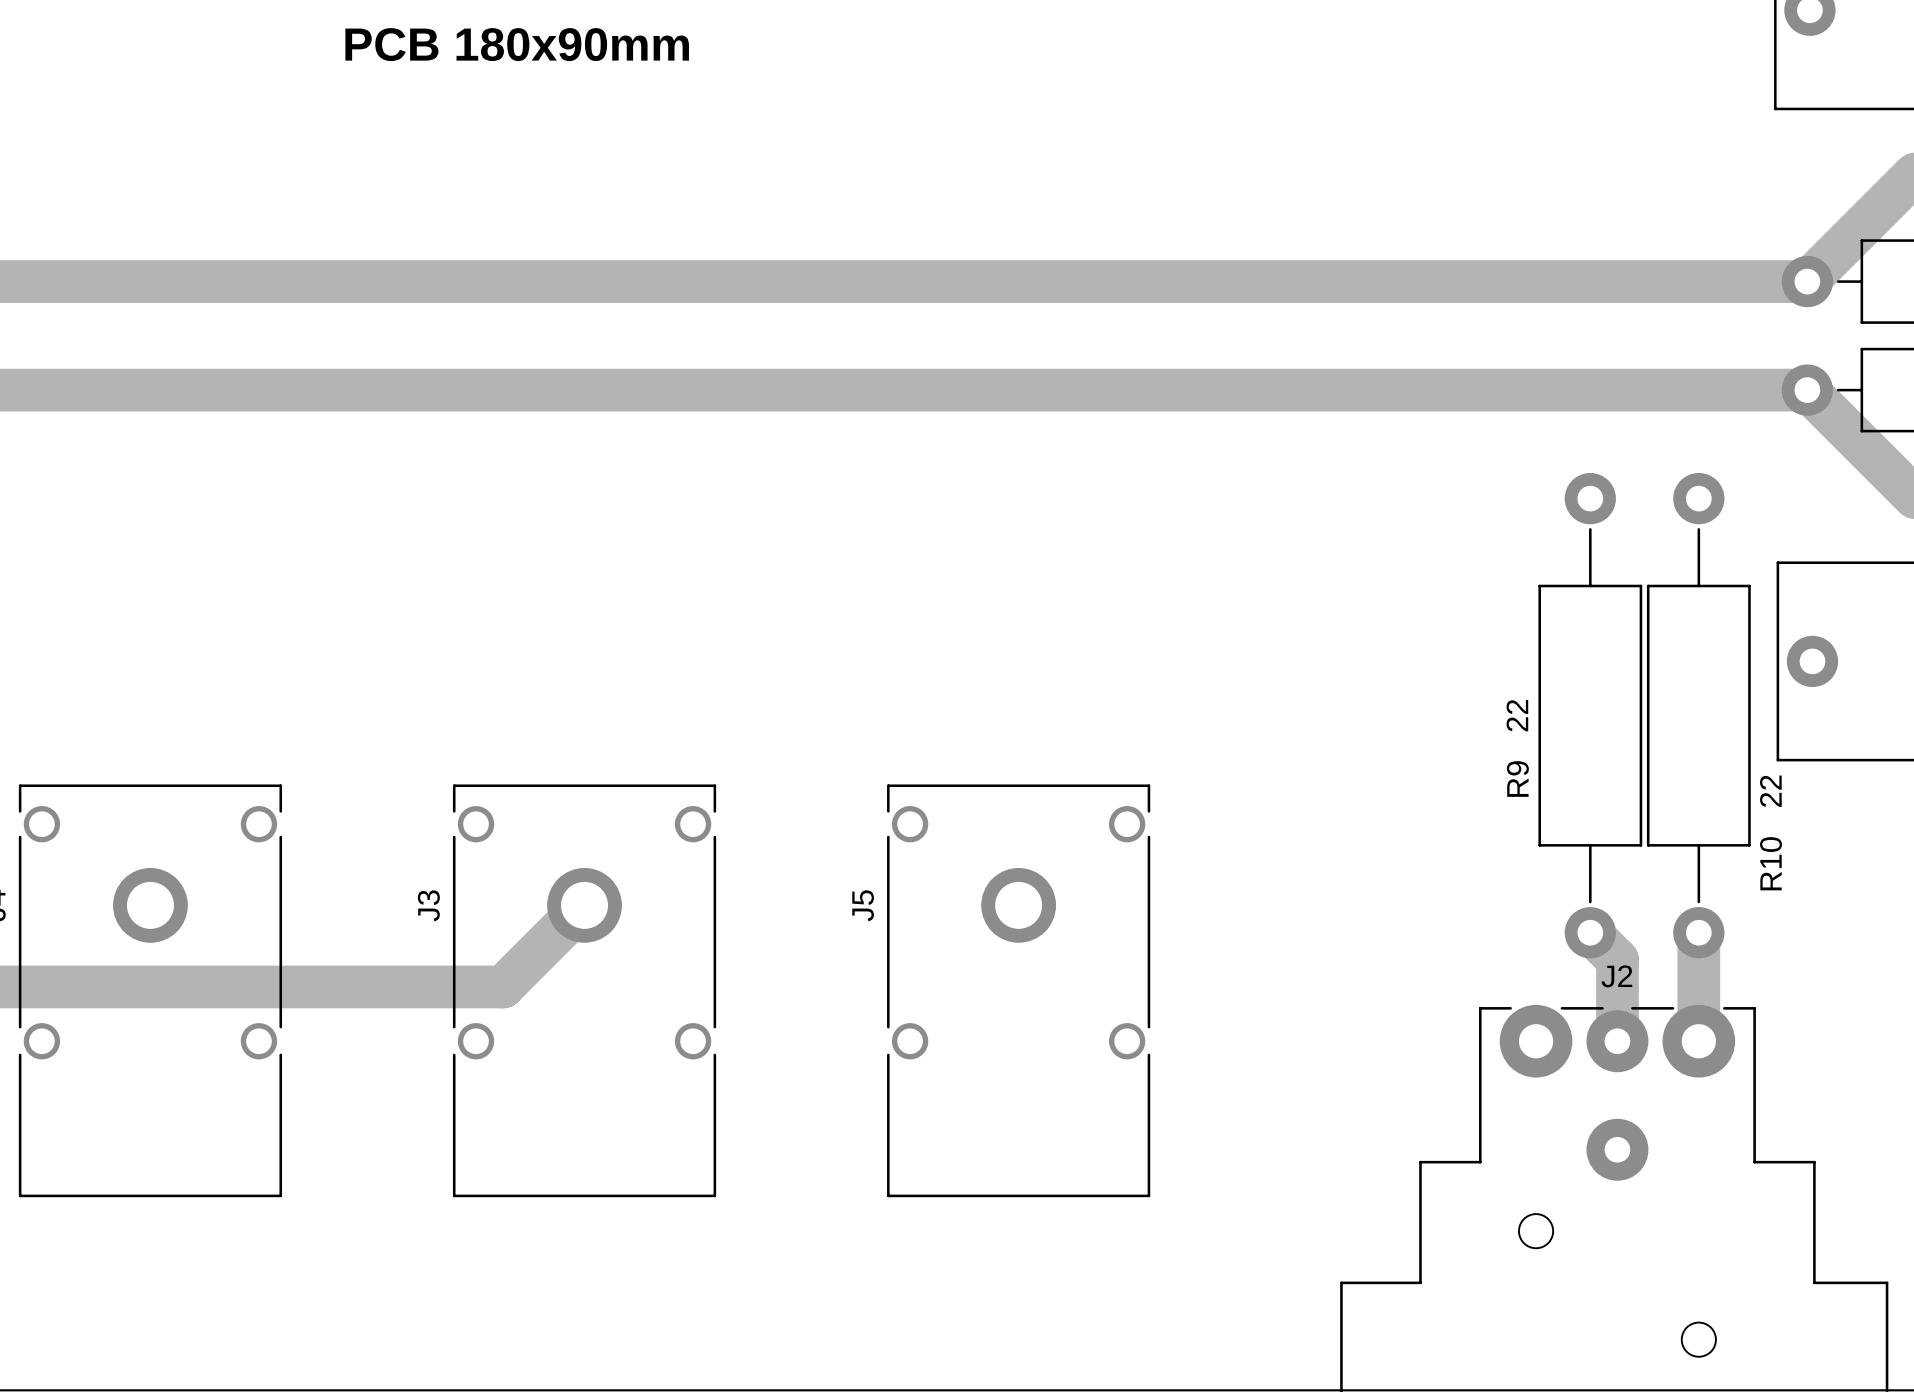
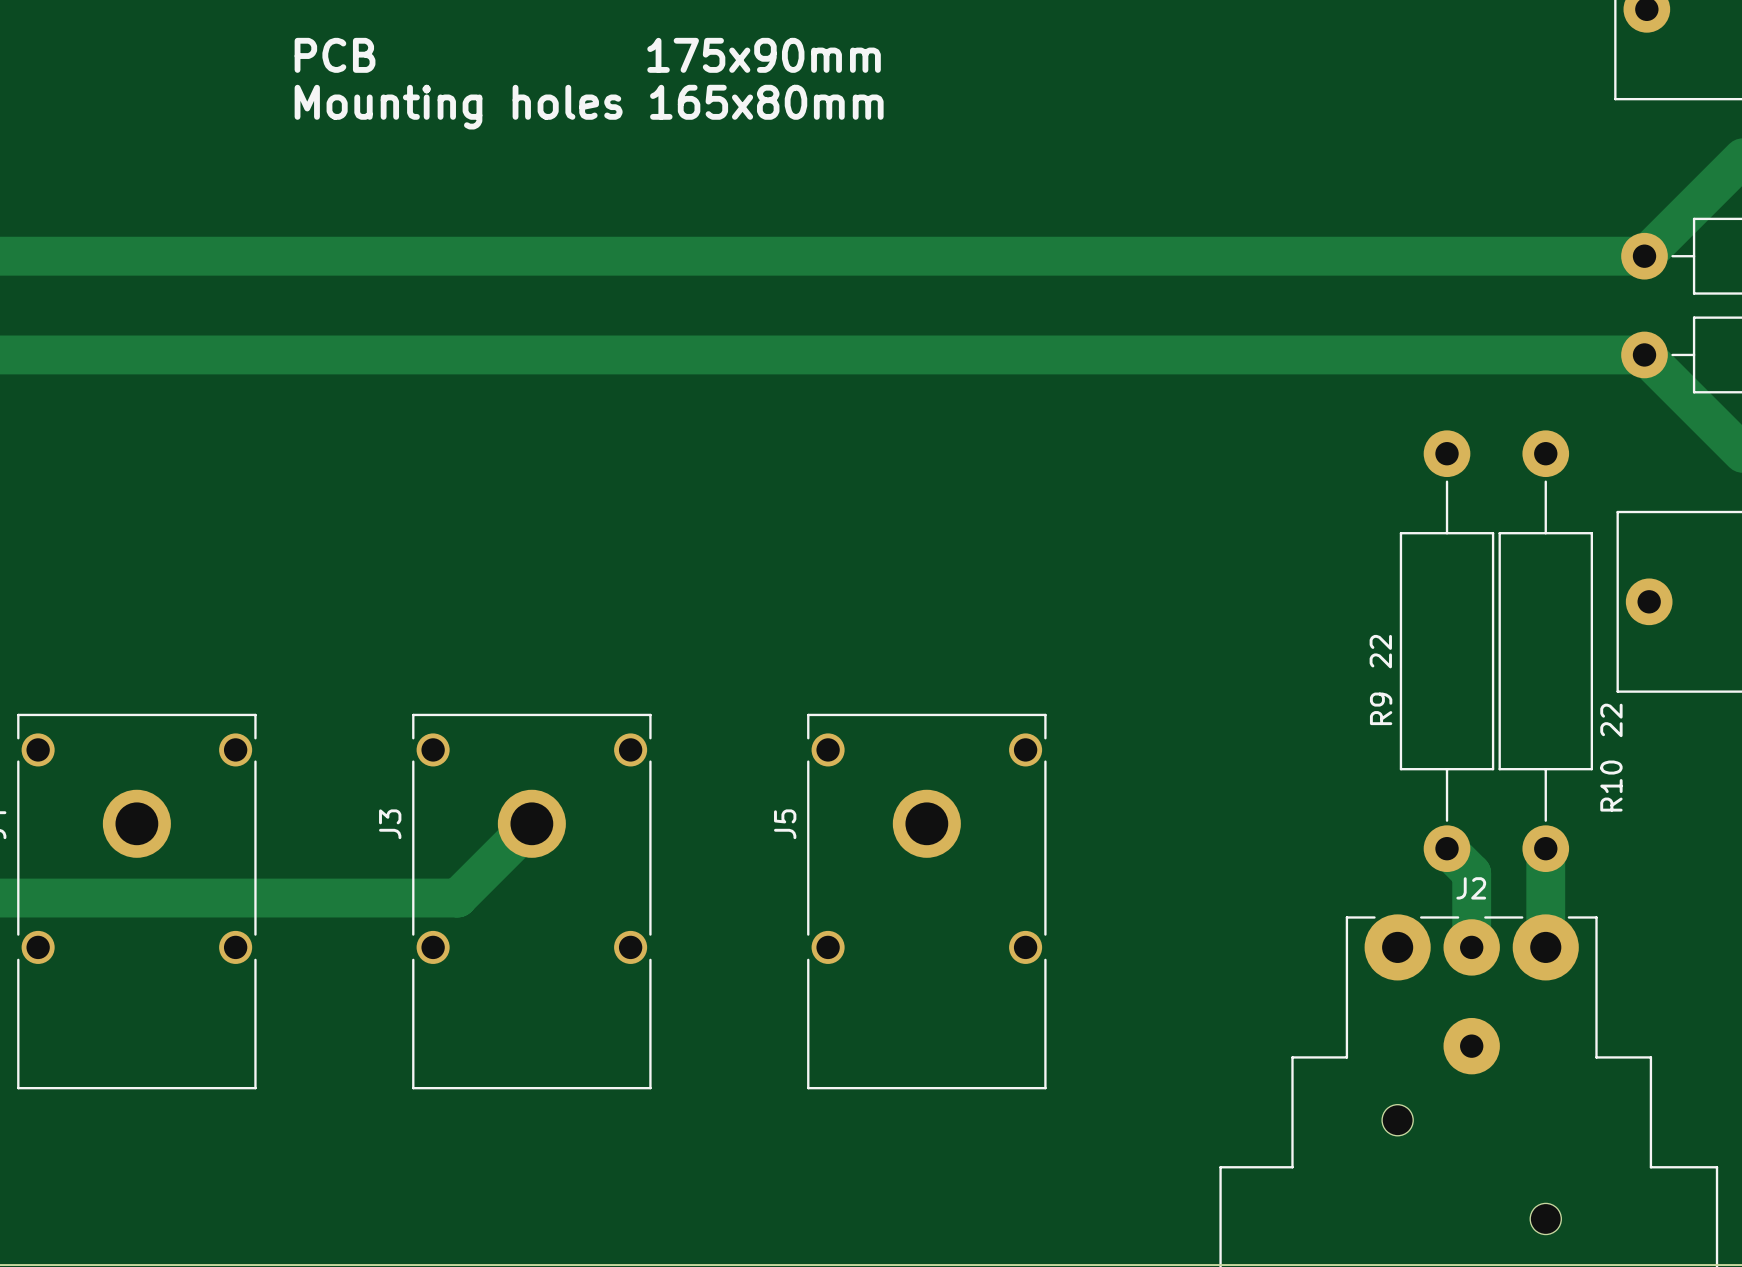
text: PCB 180x90mm (517, 44) -> none
text: none -> PCB 175x90mm (587, 55)
text: none -> Mounting holes 165x80mm (589, 107)

